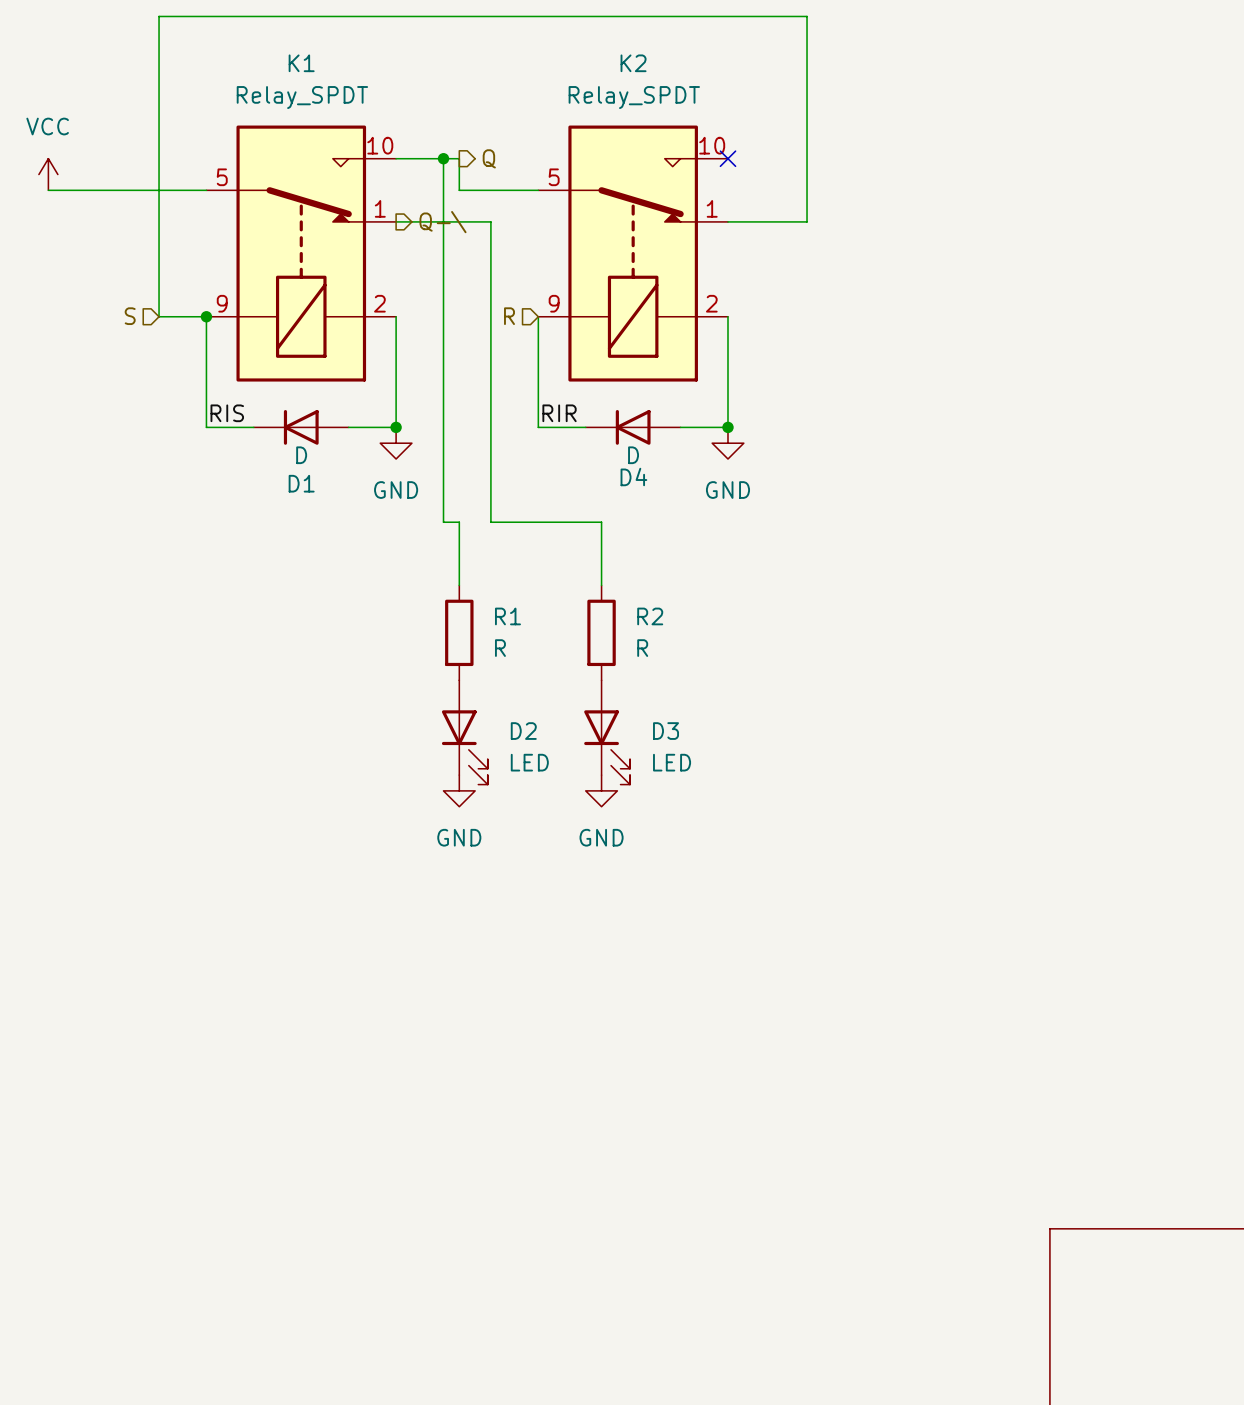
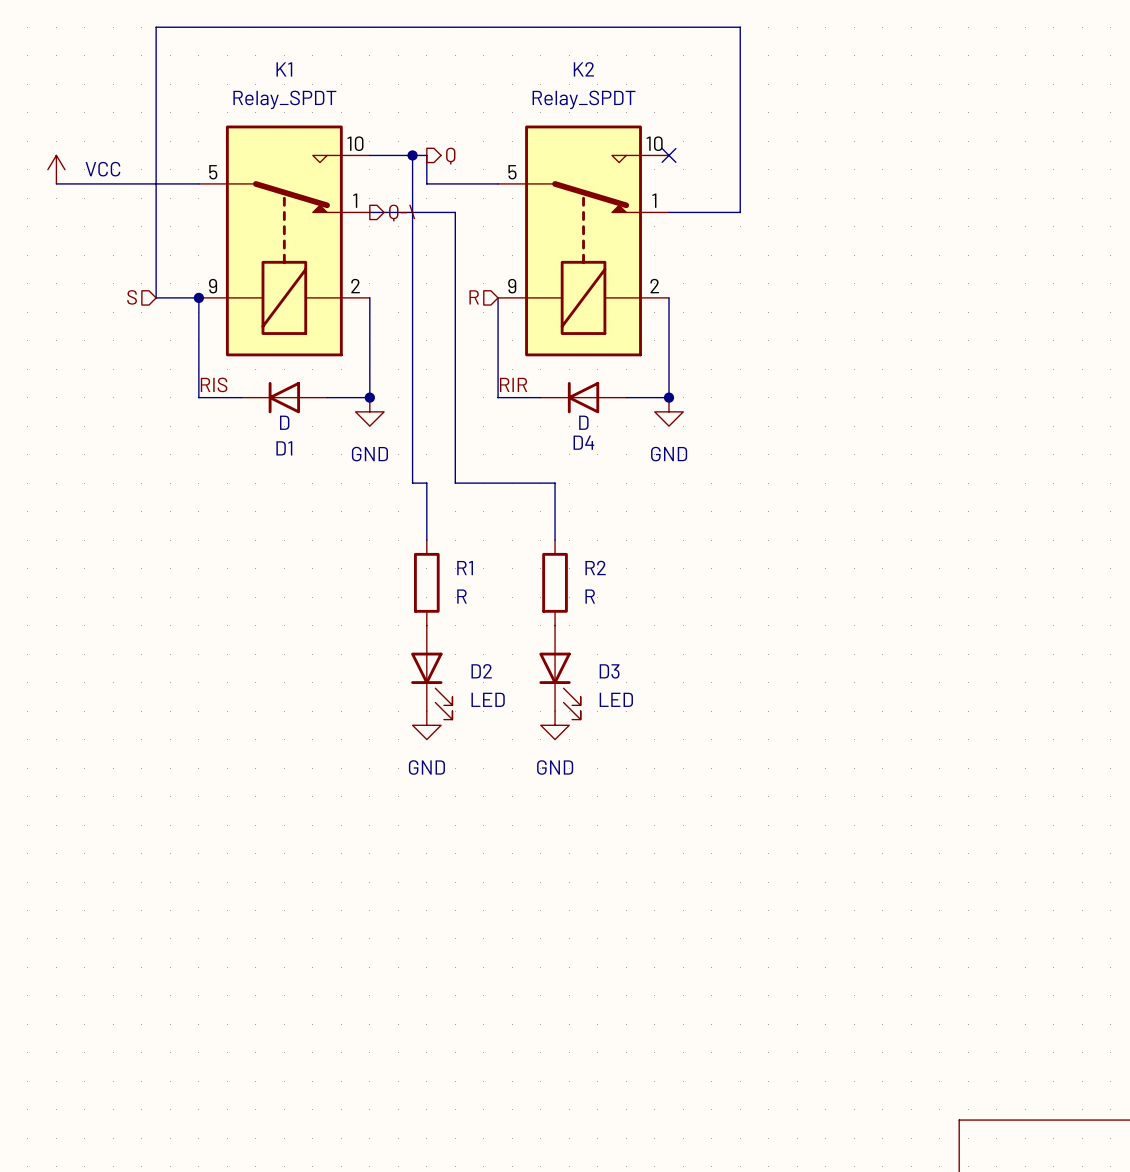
power symbol text position: VCC (47, 126) -> VCC (102, 169)

